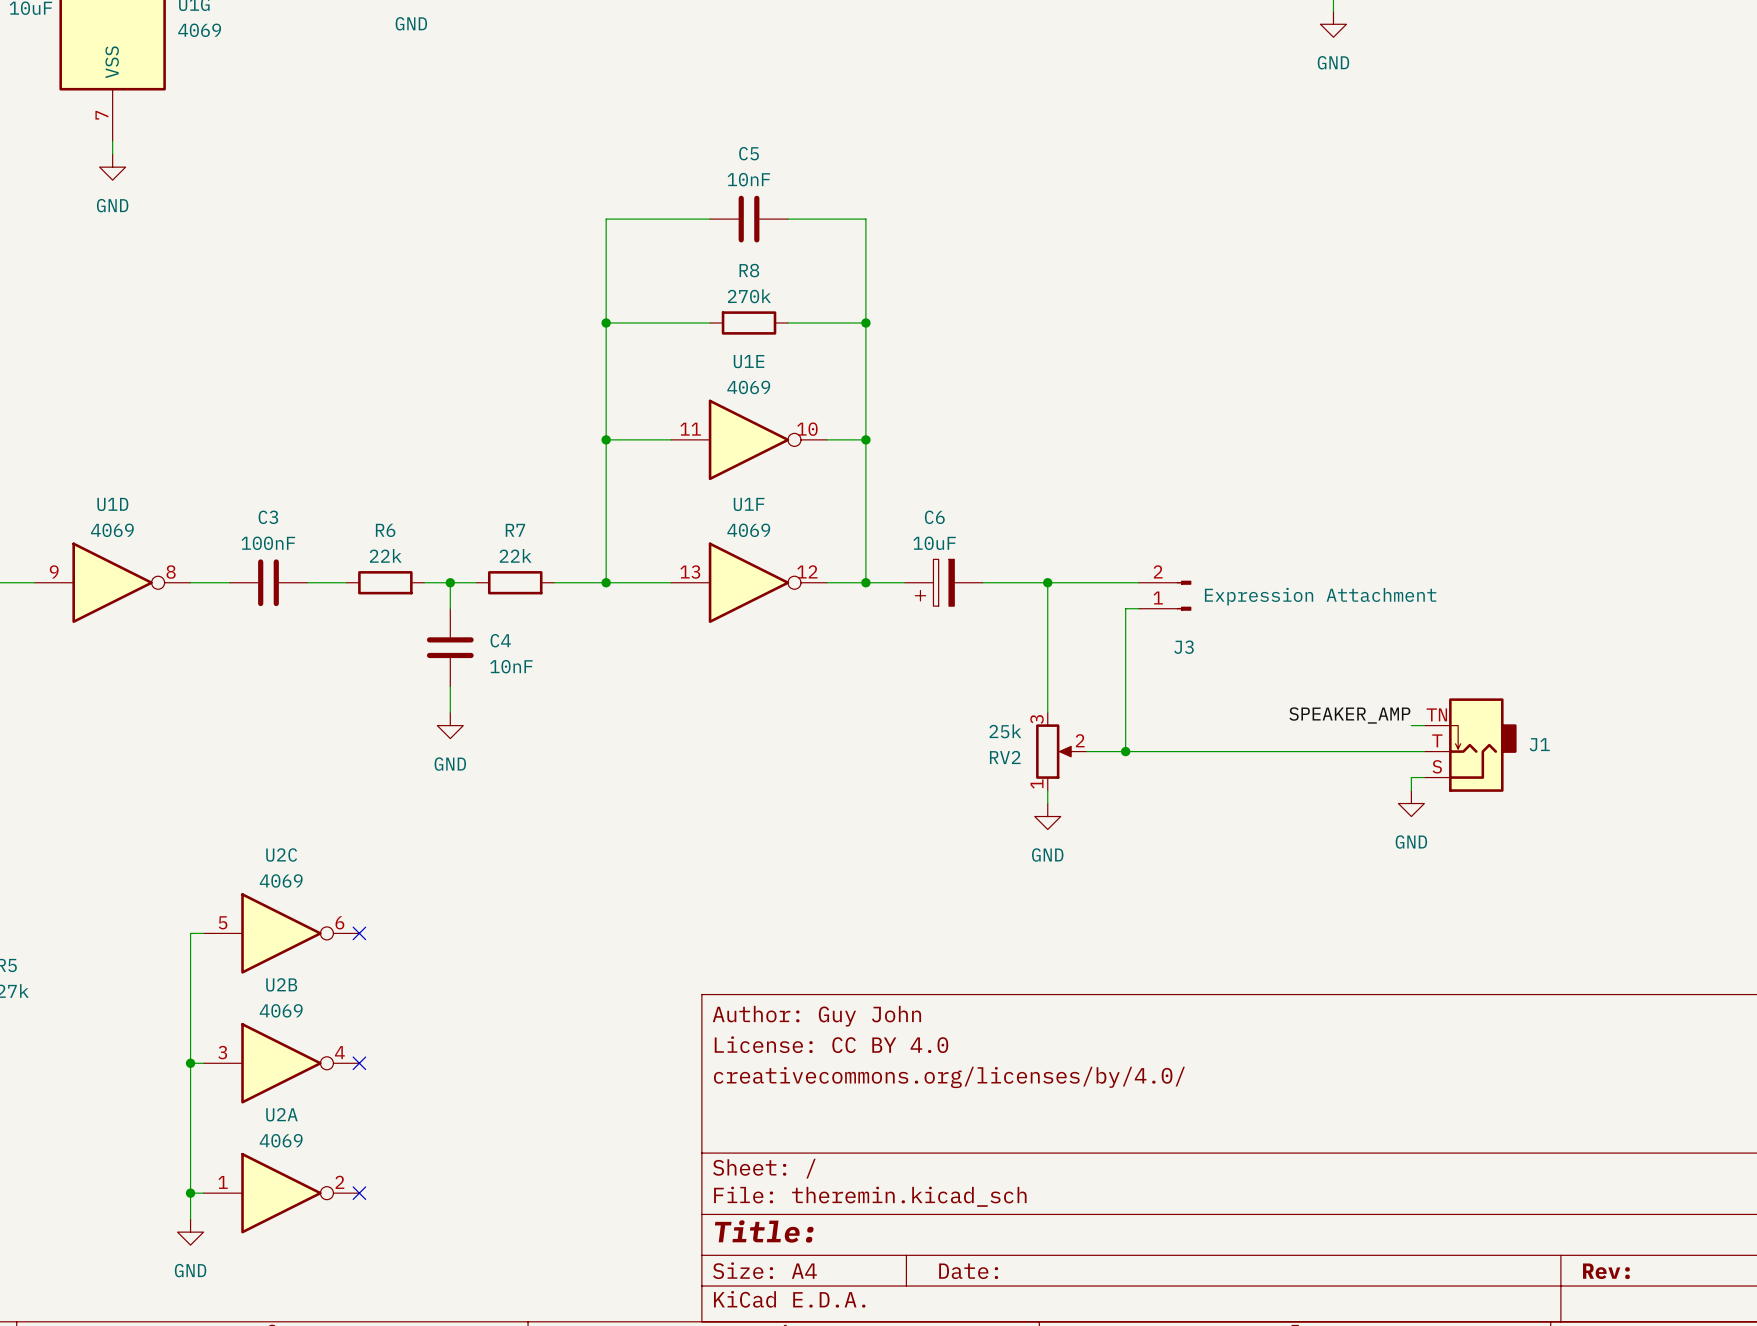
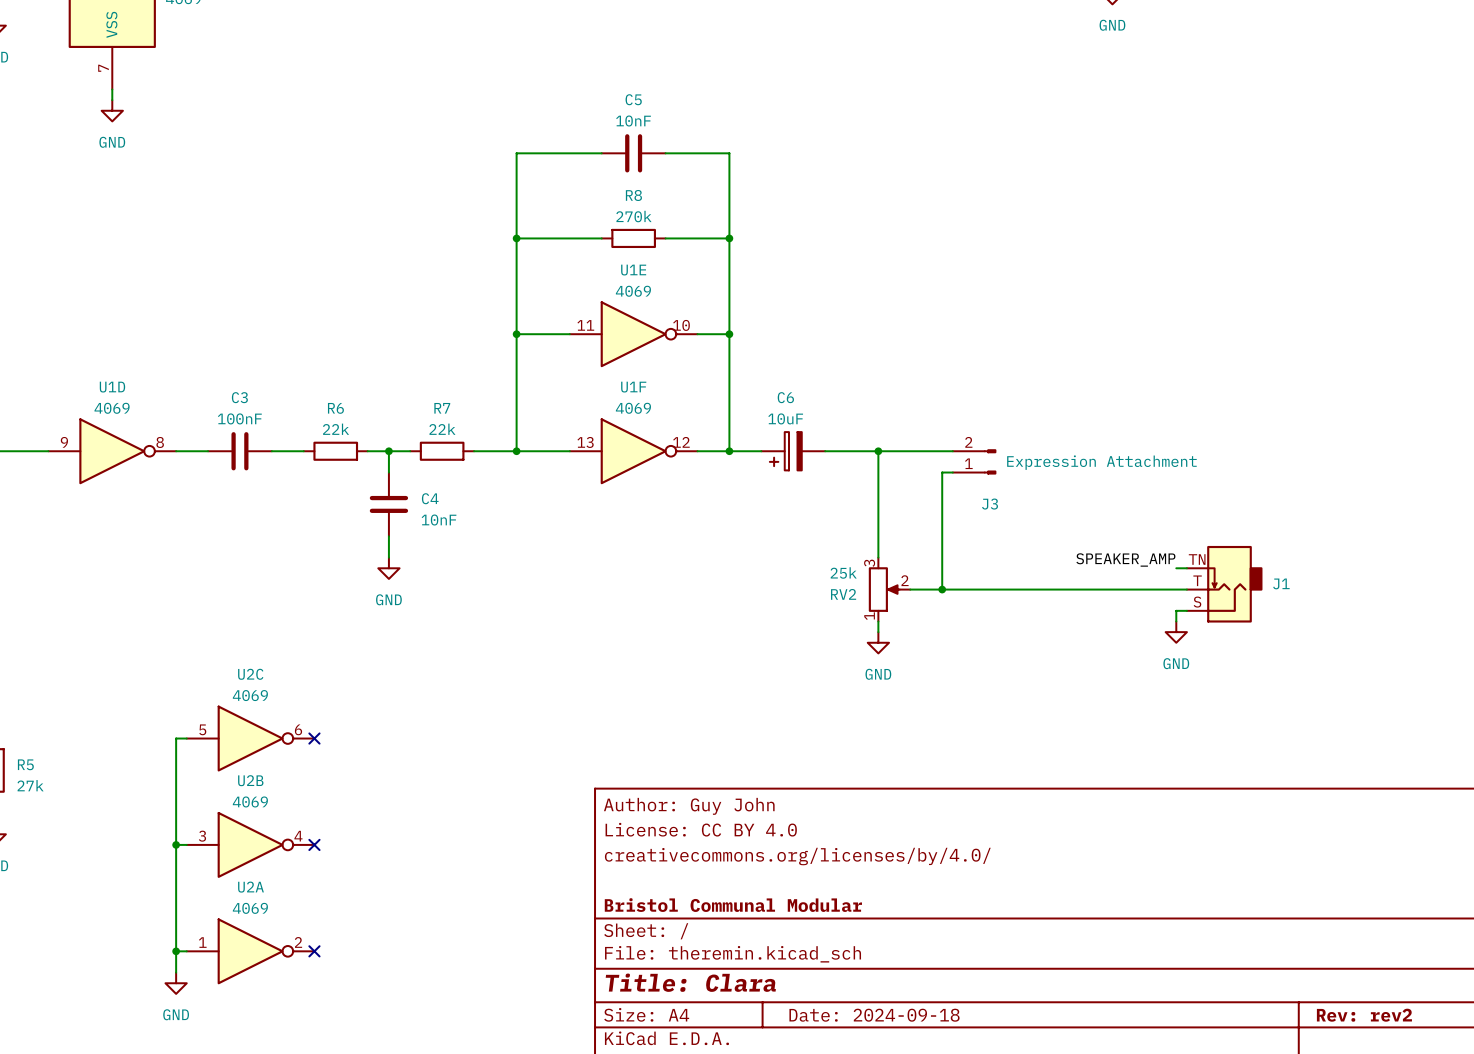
title block: none -> Bristol Communal Modular (733, 905)
title block: Title: (764, 1231) -> Title: Clara (690, 982)
title block: Date: (968, 1271) -> Date: 2024-09-18 (874, 1015)
title block: Rev: (1606, 1271) -> Rev: rev2 (1364, 1015)

